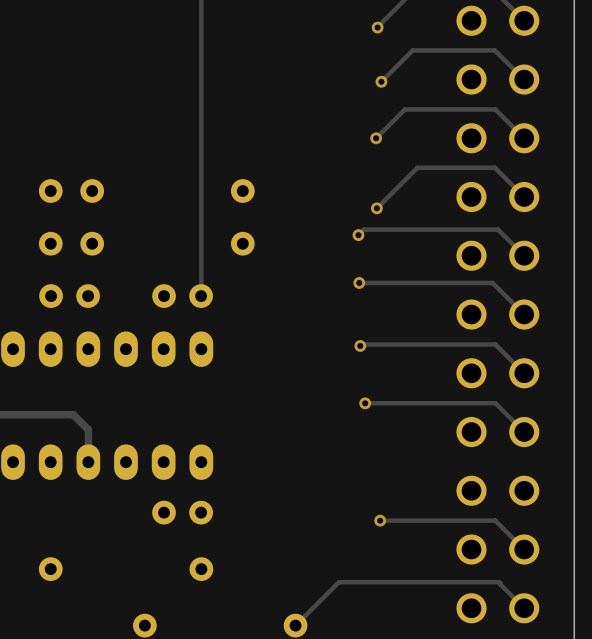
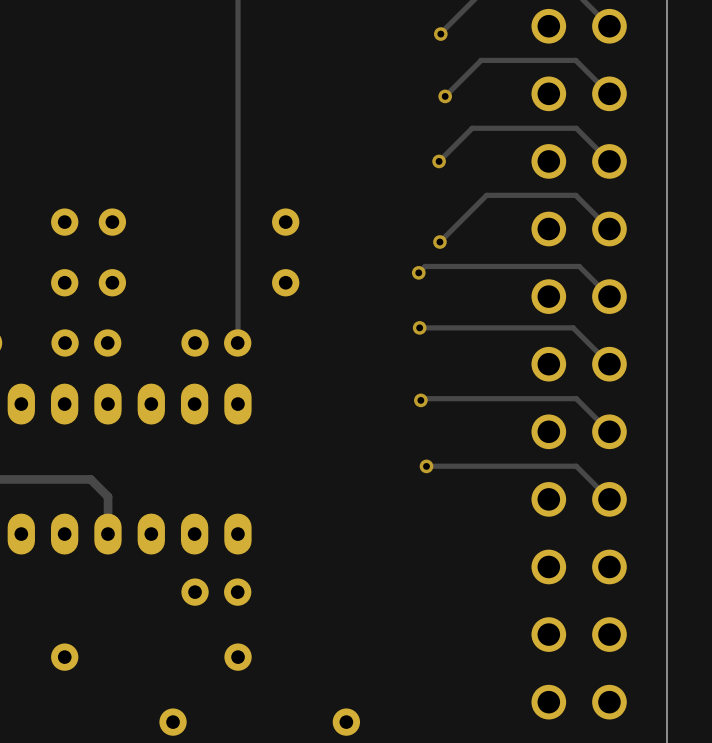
track: (380, 520) (495, 520) (524, 549) -> none
via: (380, 520) -> none
track: (524, 608) (499, 582) (338, 582) (295, 625) -> none

